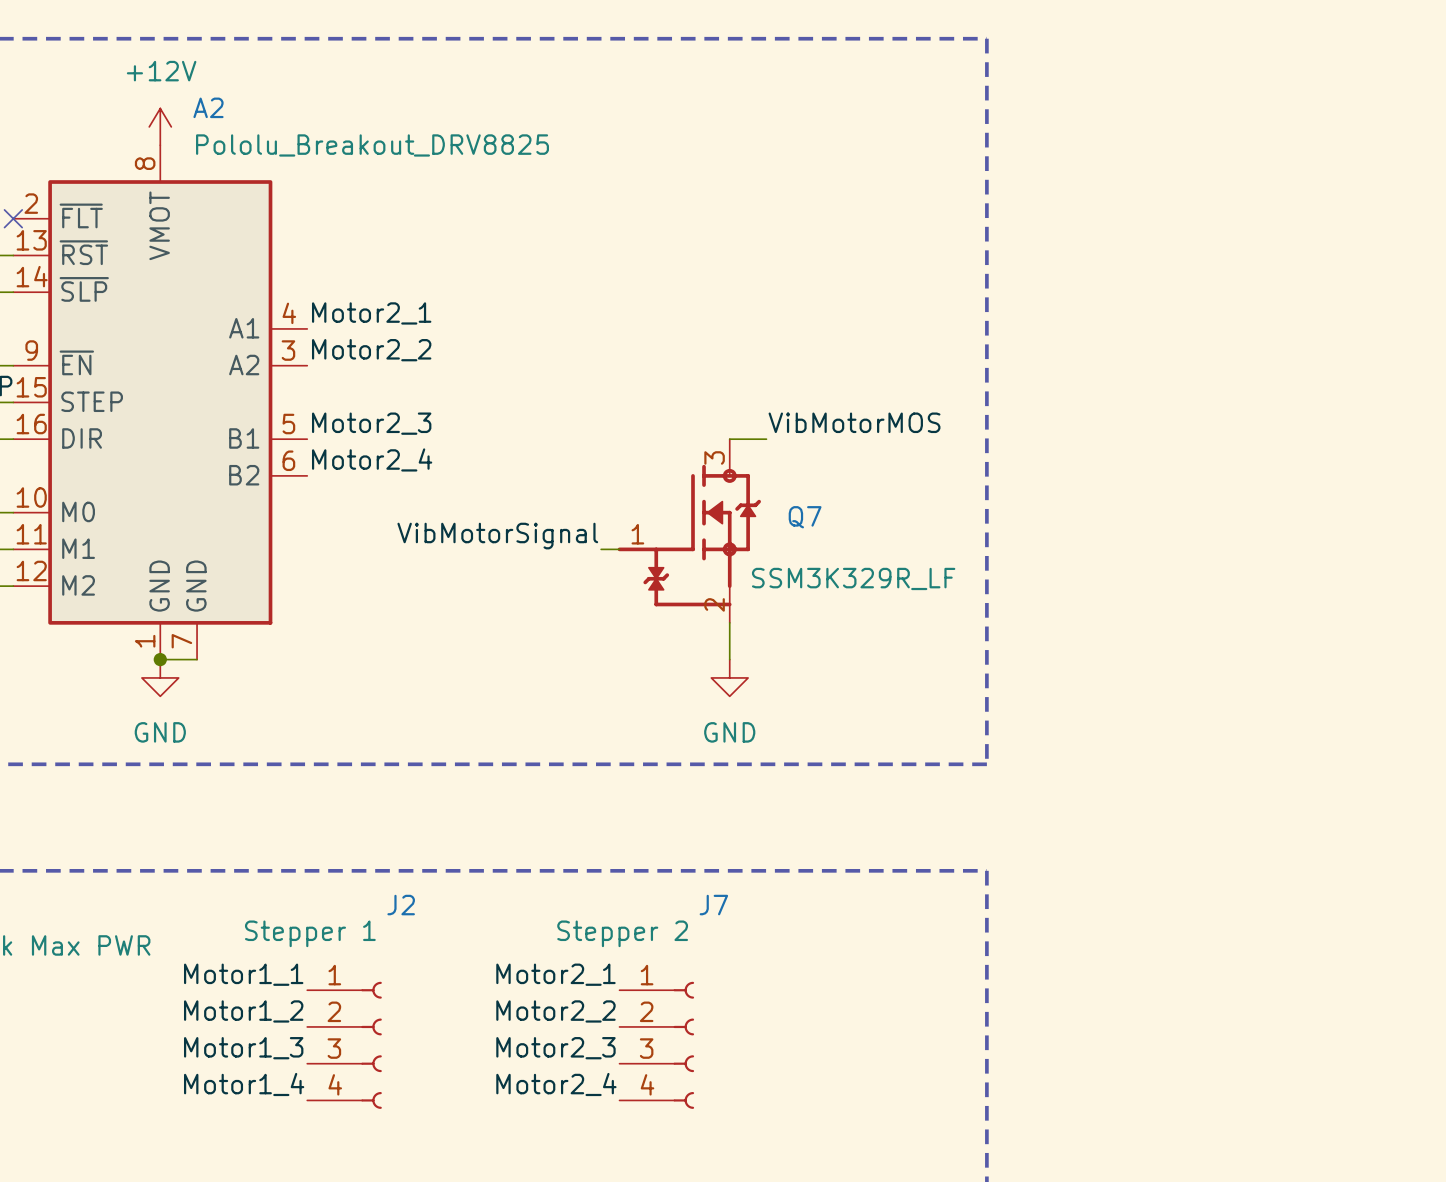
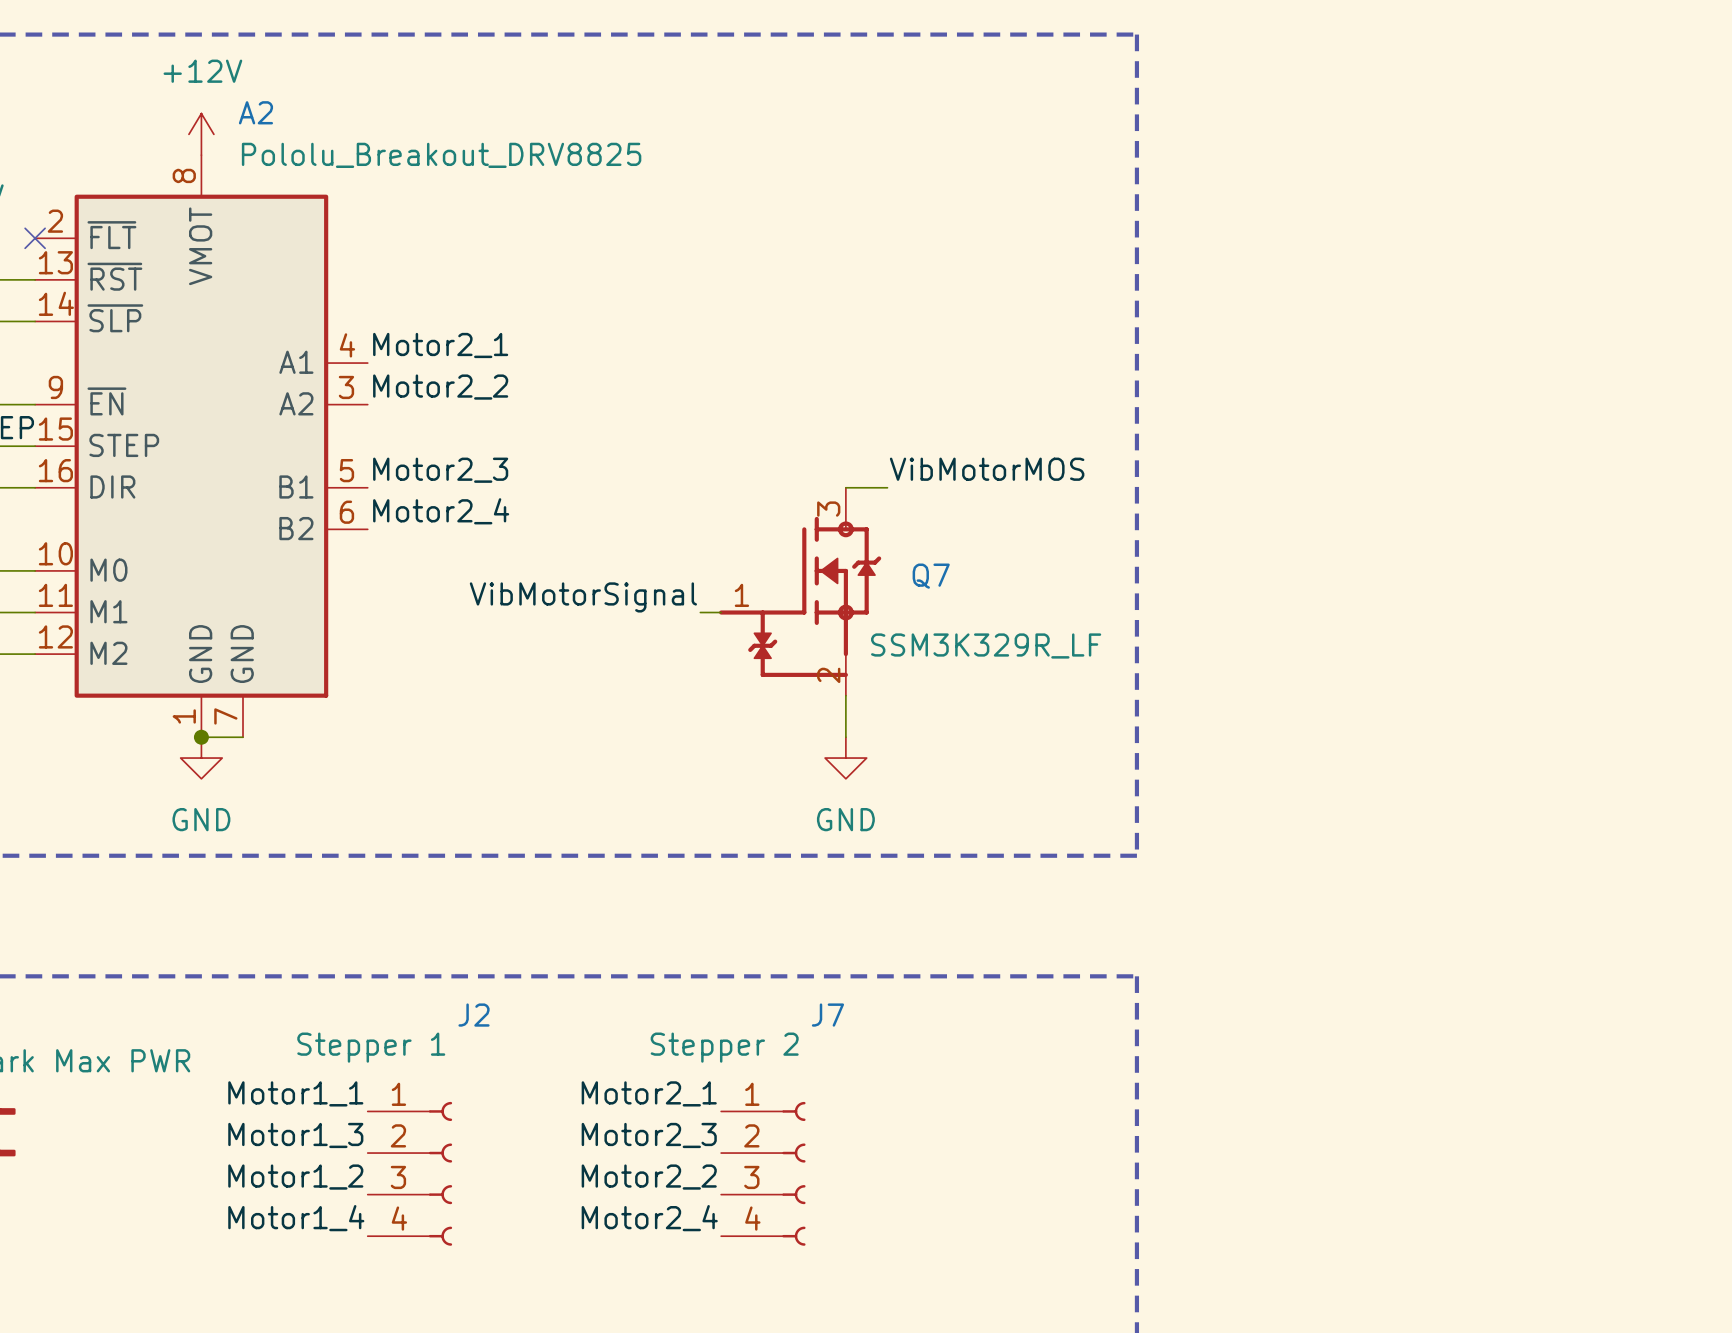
label: Motor1_2 (243, 1011) -> Motor1_3 (295, 1135)
label: Motor2_2 (555, 1011) -> Motor2_3 (649, 1135)
label: Motor1_3 (243, 1048) -> Motor1_2 (295, 1177)
label: Motor2_3 (555, 1048) -> Motor2_2 (649, 1177)

